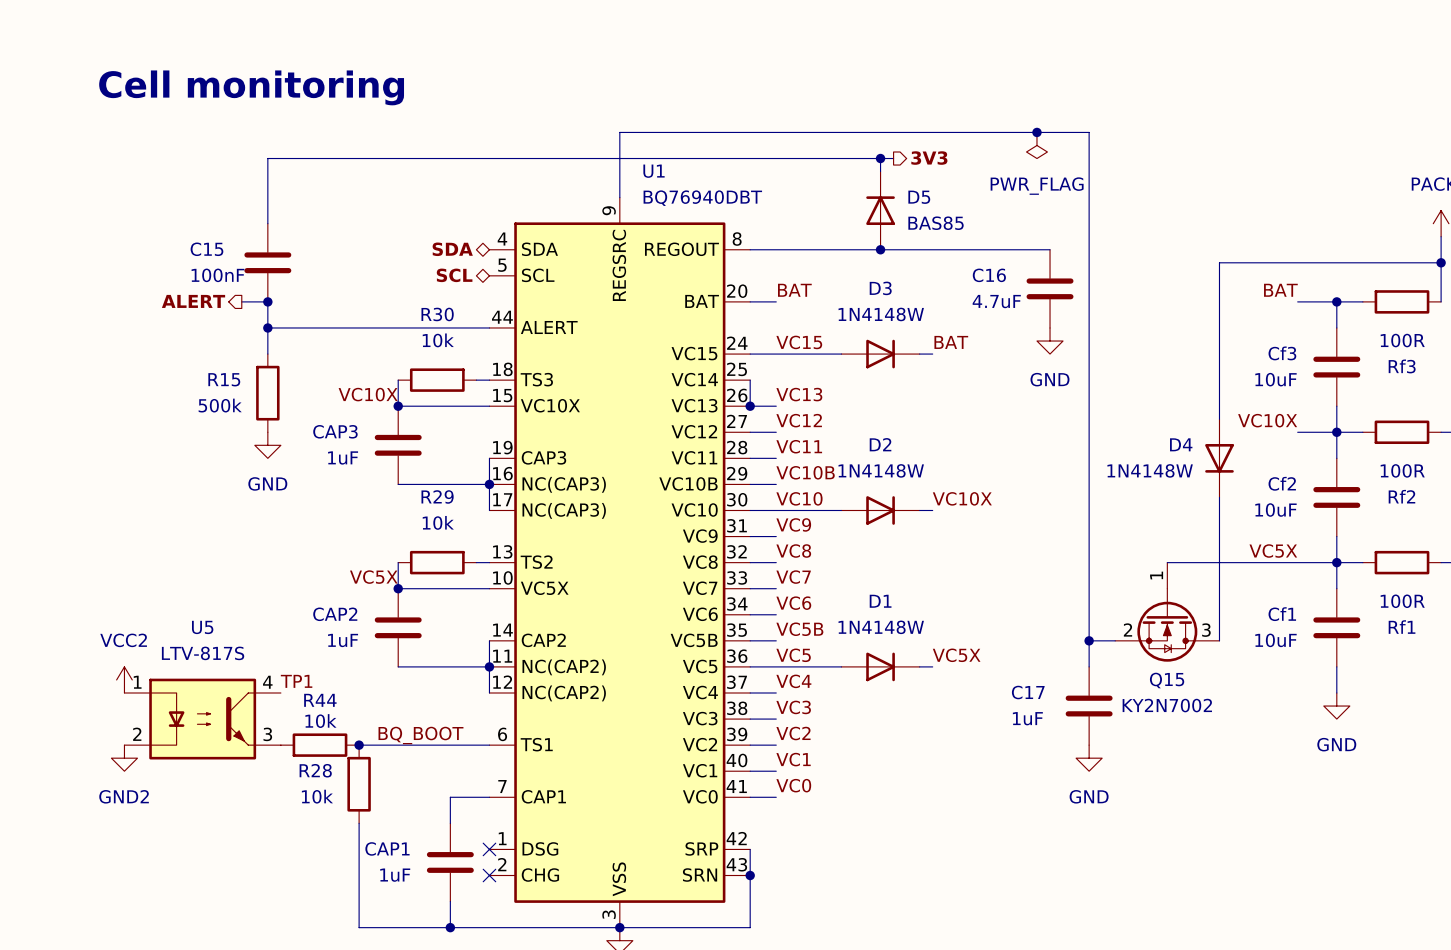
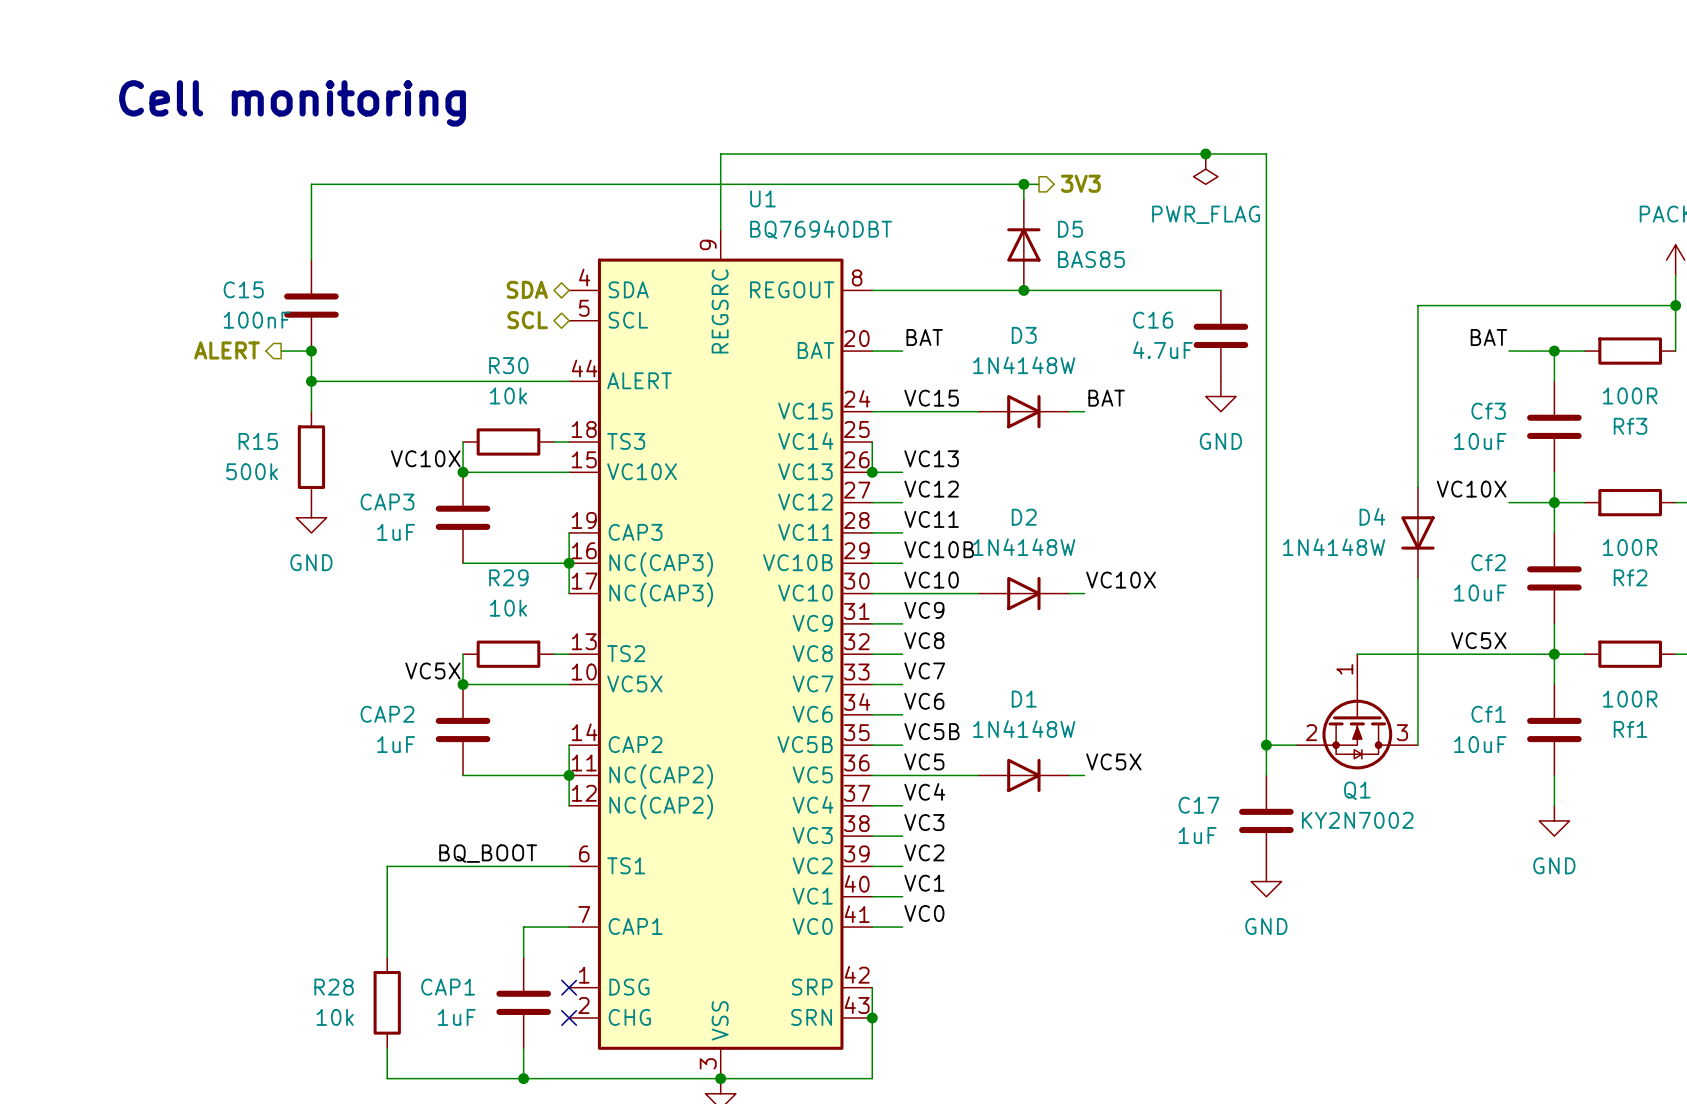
power symbol: VCC2 (124, 679) -> none
Q15 name: Q15 (1167, 680) -> Q1 (1357, 790)
label: TP1 (296, 681) -> none
U5: LTV-817S (202, 719) -> none
R44: 10k (319, 745) -> none
wire: none -> (417, 866) (387, 866) (387, 957)
junction: (359, 745) -> none
power symbol: GND2 (124, 758) -> none
R28 position: (359, 784) -> (387, 1002)
wire: (359, 823) (359, 927) -> (387, 1048) (387, 1078) (417, 1078)

